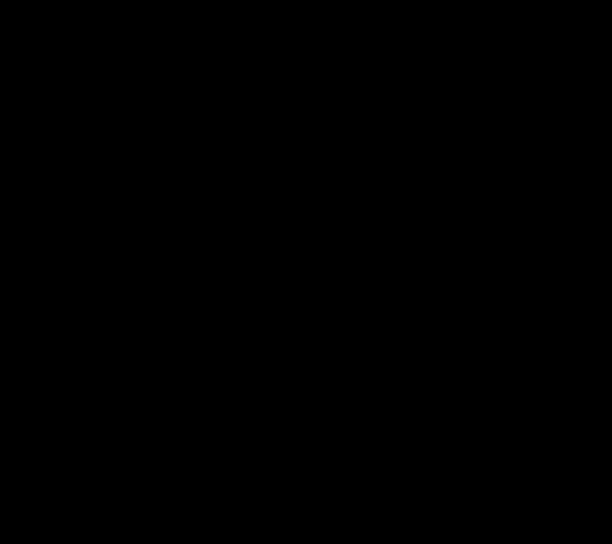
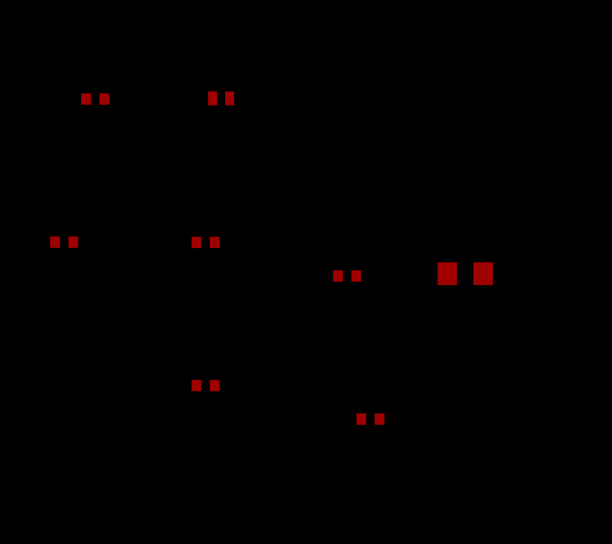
part: none -> (221, 98)
part: none -> (95, 99)
part: none -> (64, 242)
part: none -> (205, 242)
part: none -> (465, 273)
part: none -> (347, 275)
part: none -> (205, 385)
part: none -> (370, 419)

